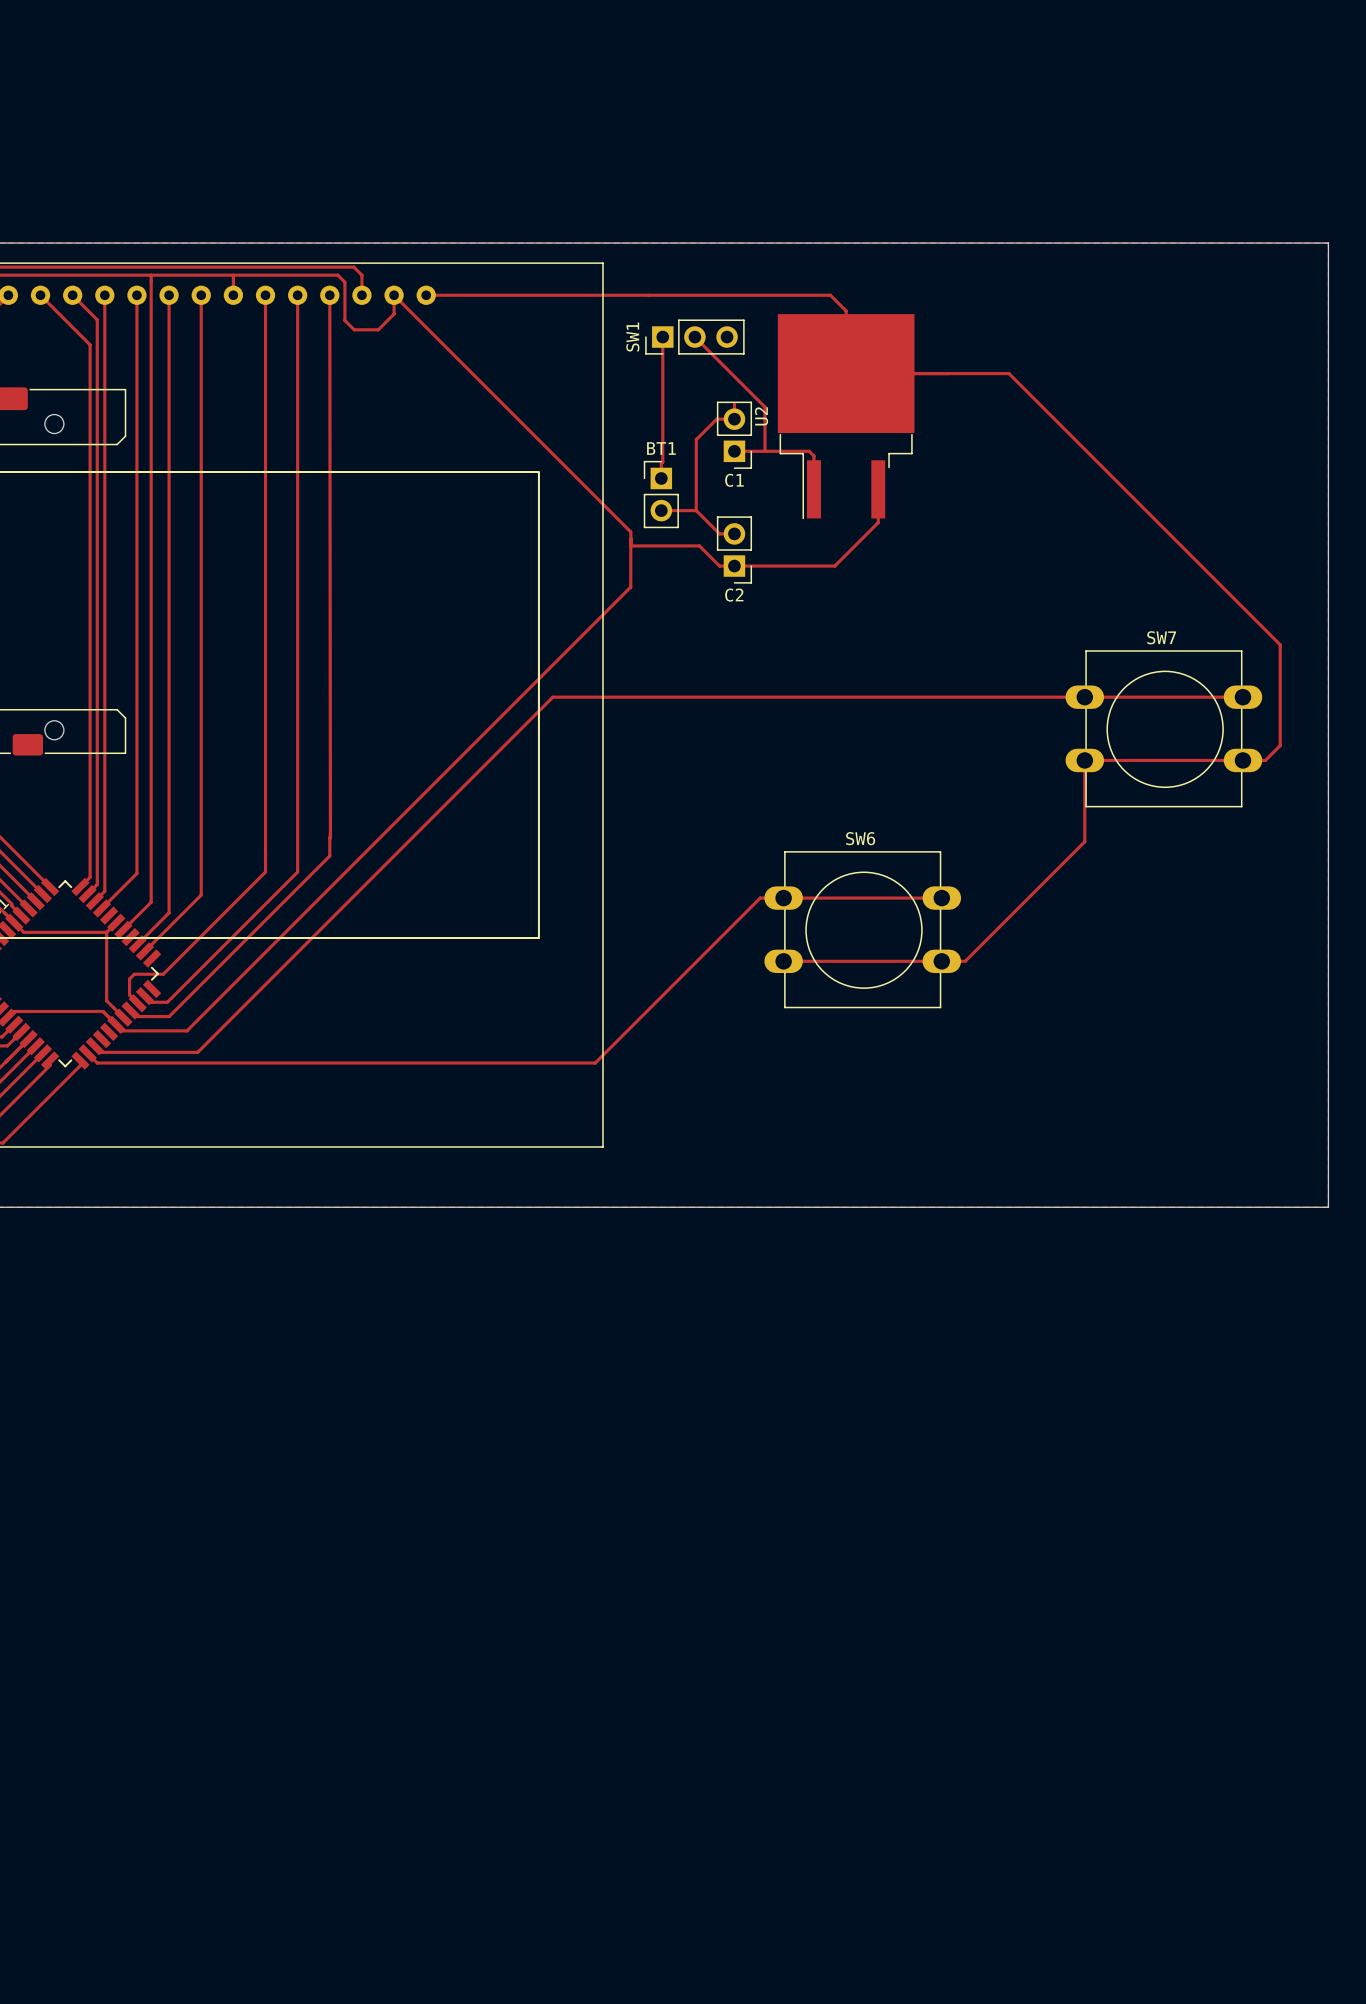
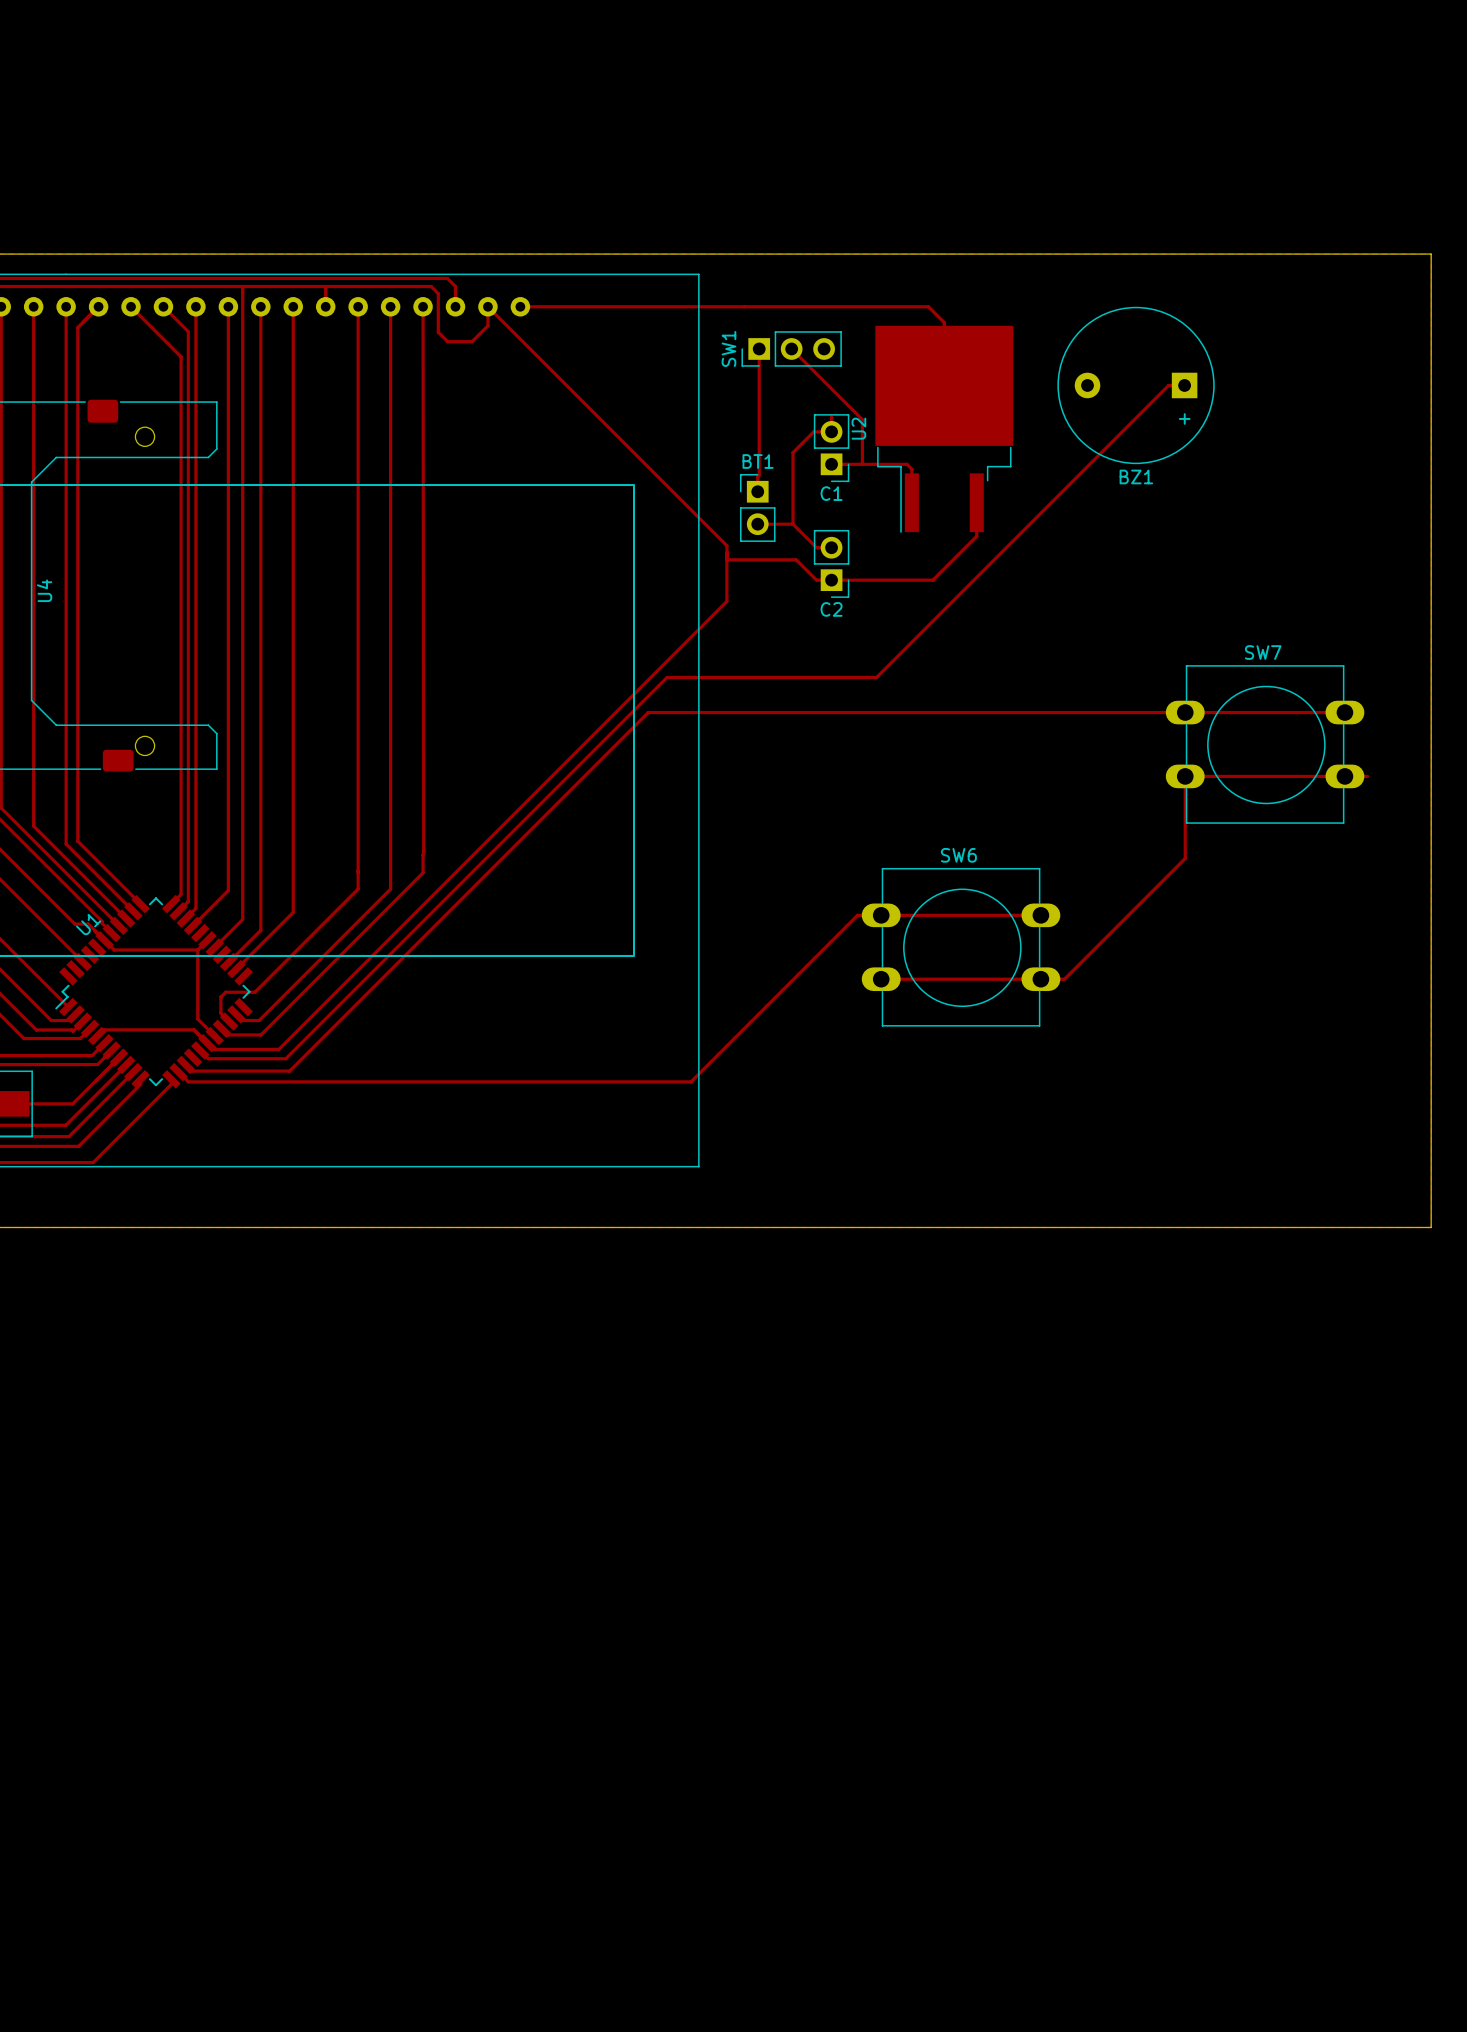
track: (846, 373) (1008, 373) (1280, 644) (1280, 745) (1265, 760) -> none
BZ1: none -> (1136, 385)
track: none -> (1184, 385) (1168, 385) (876, 677) (667, 677) (285, 1058) (208, 1058) (200, 1050)

